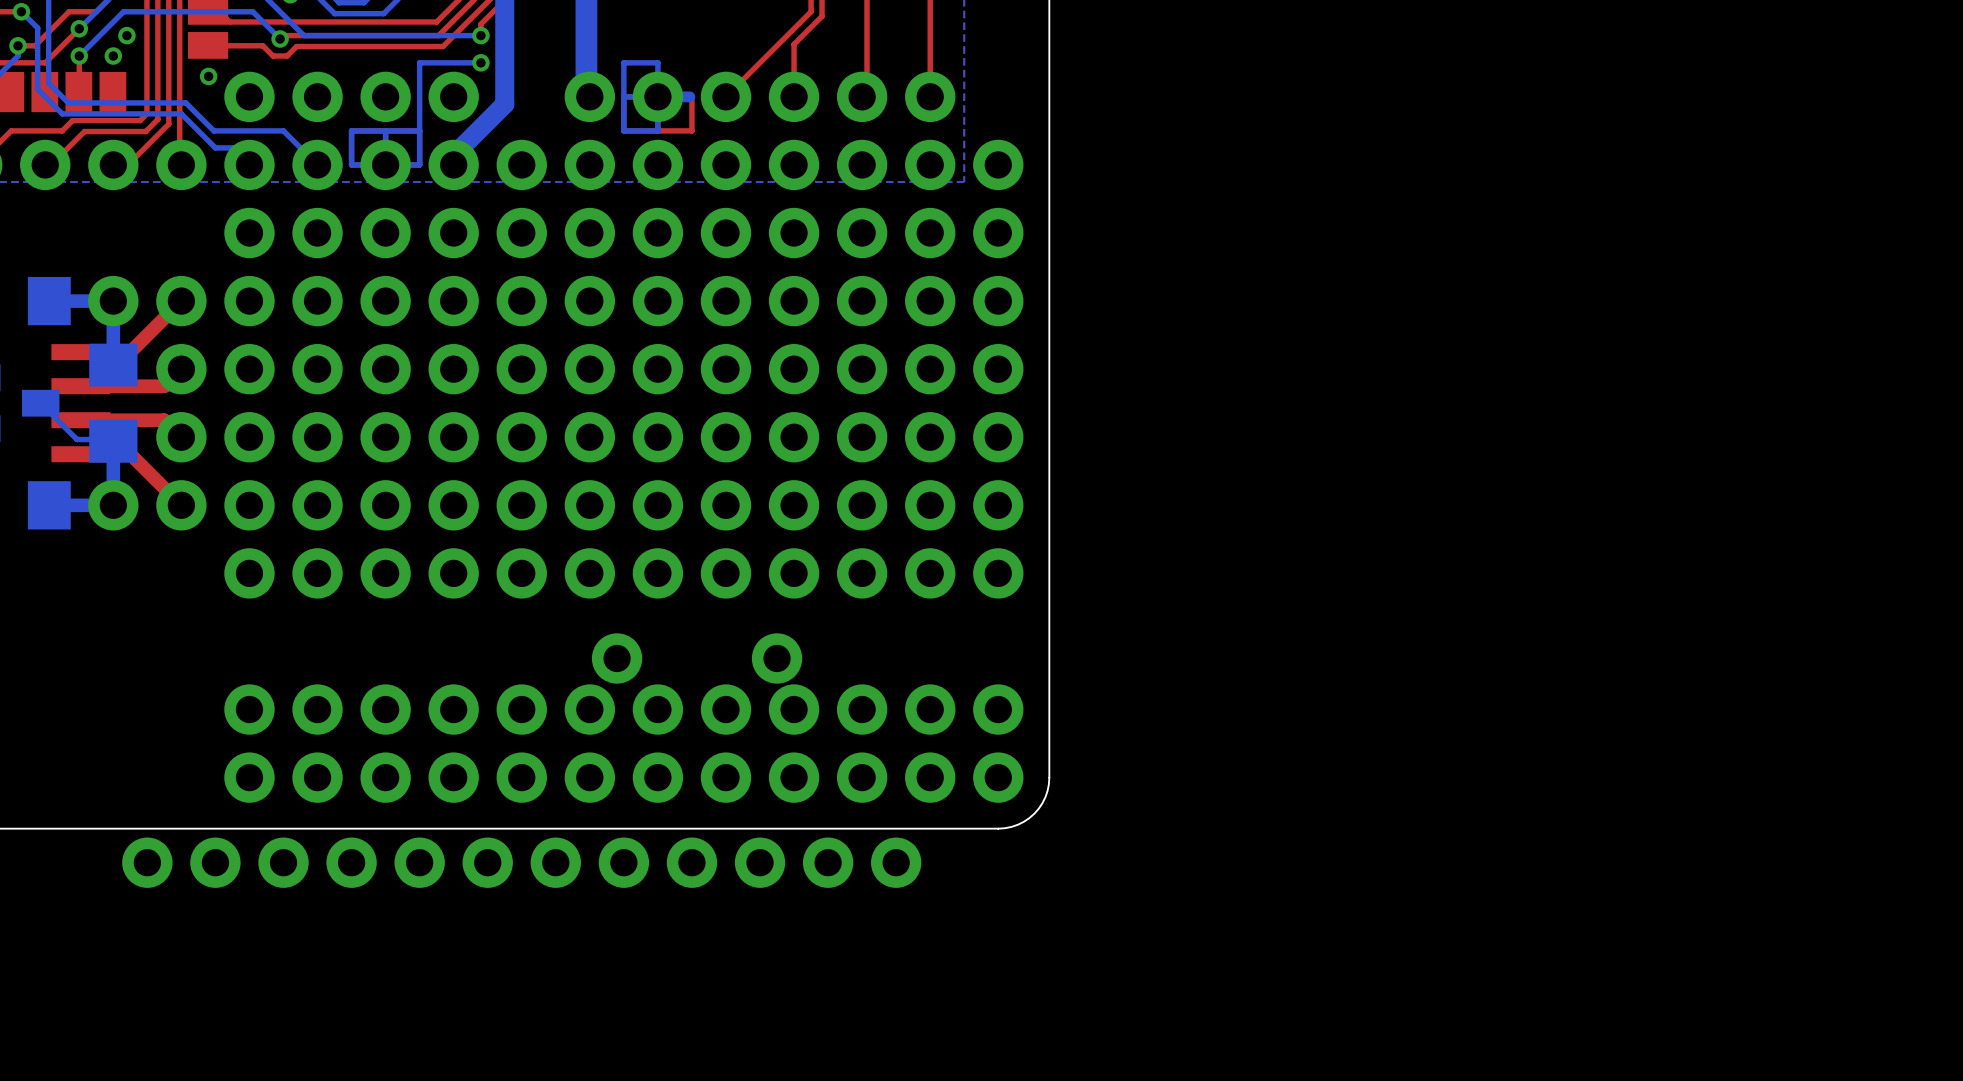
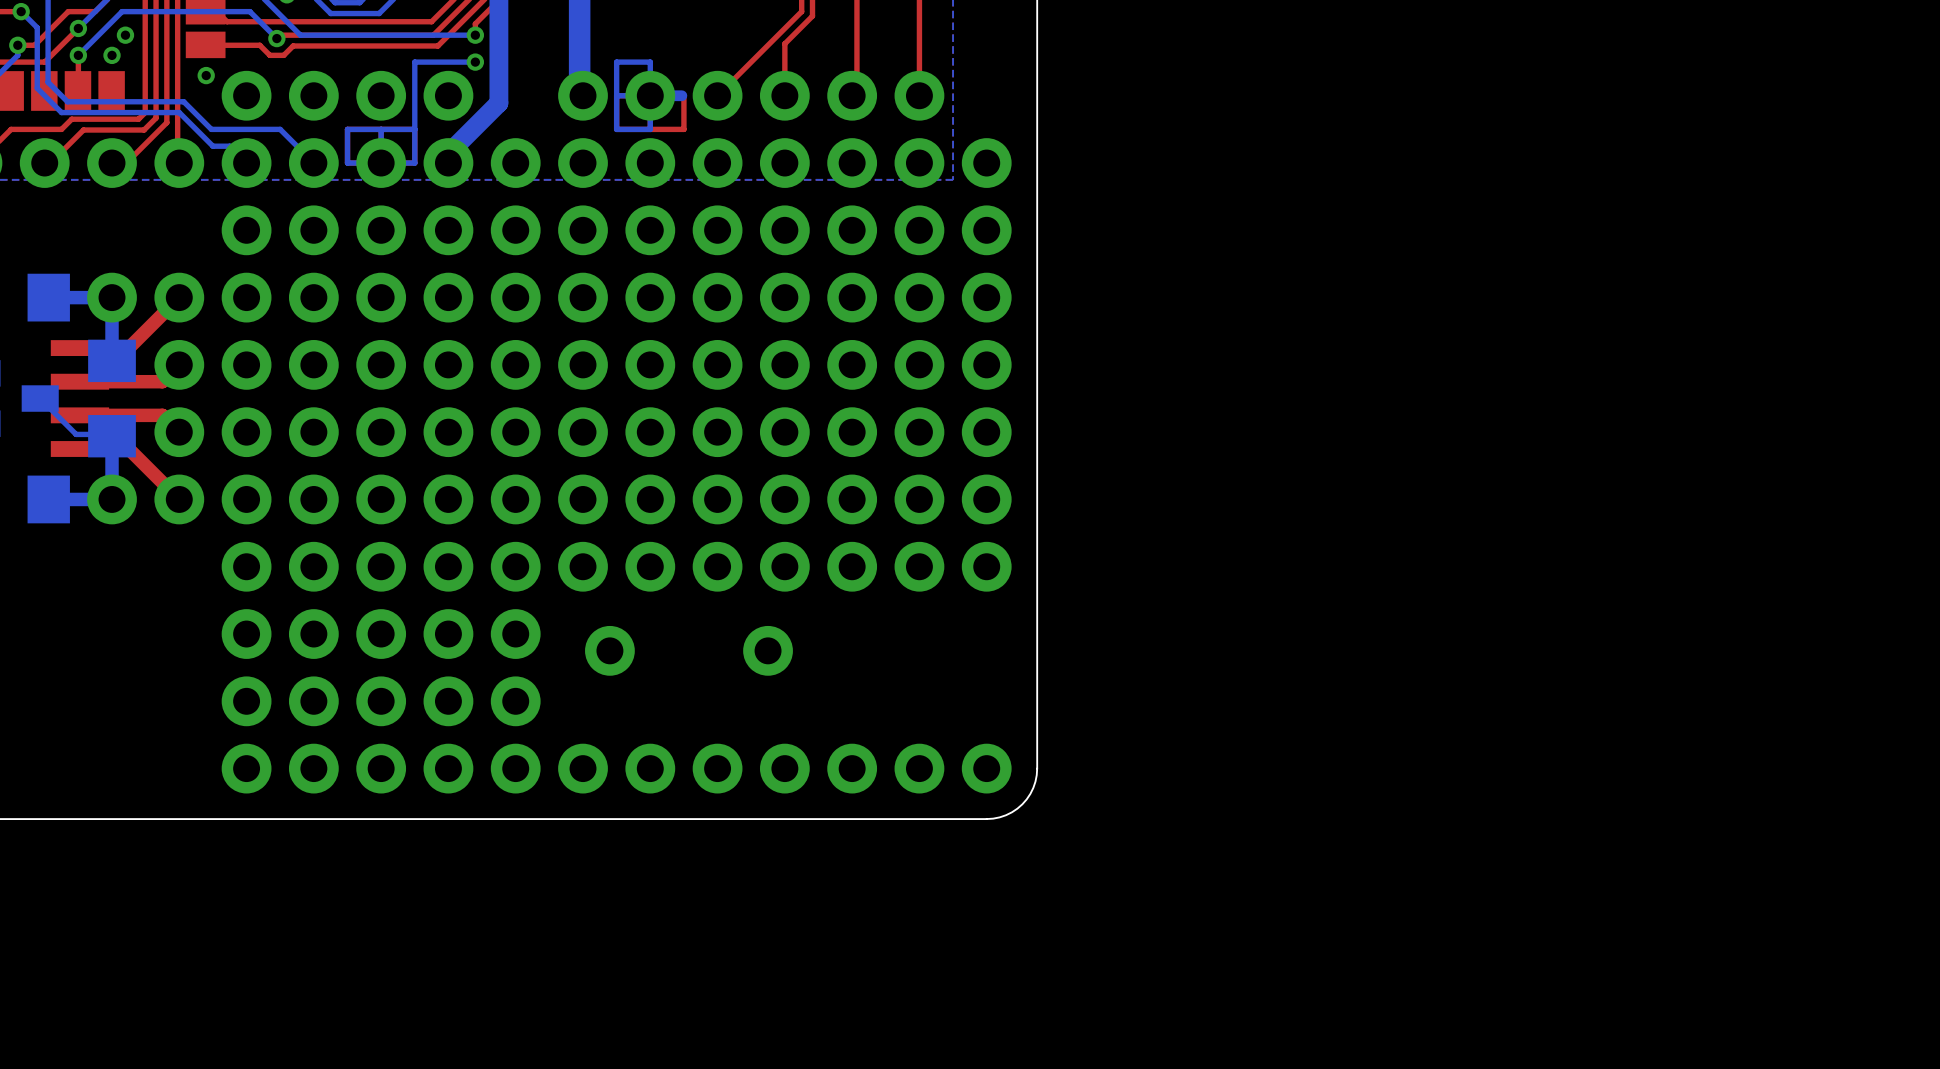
part: none -> (381, 634)
part: (623, 709) -> none
part: (521, 862) -> none

